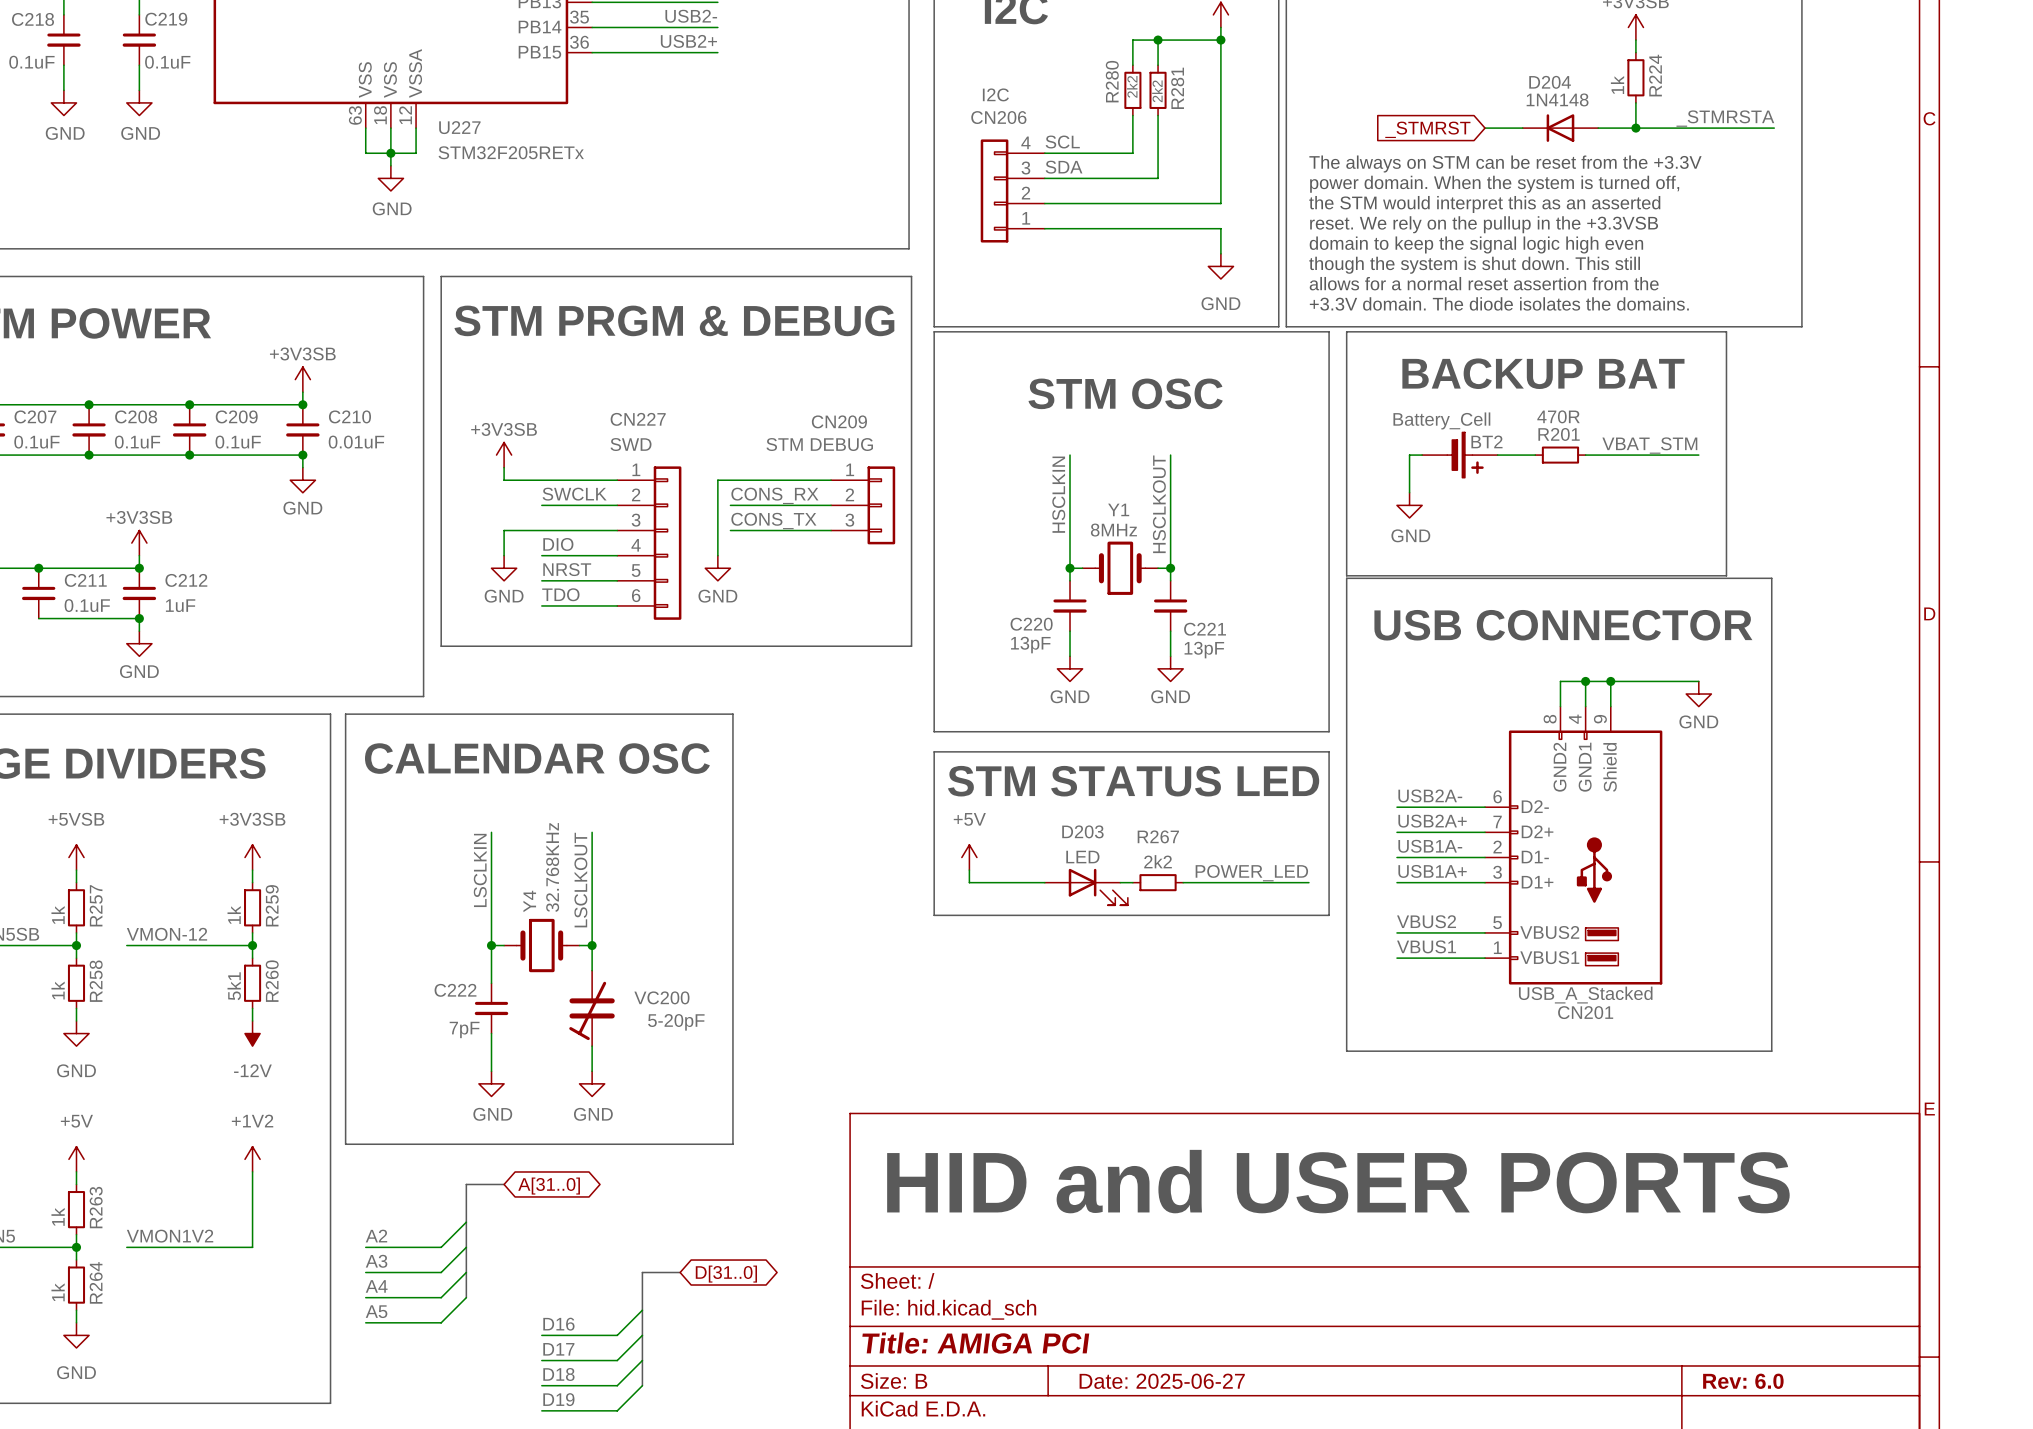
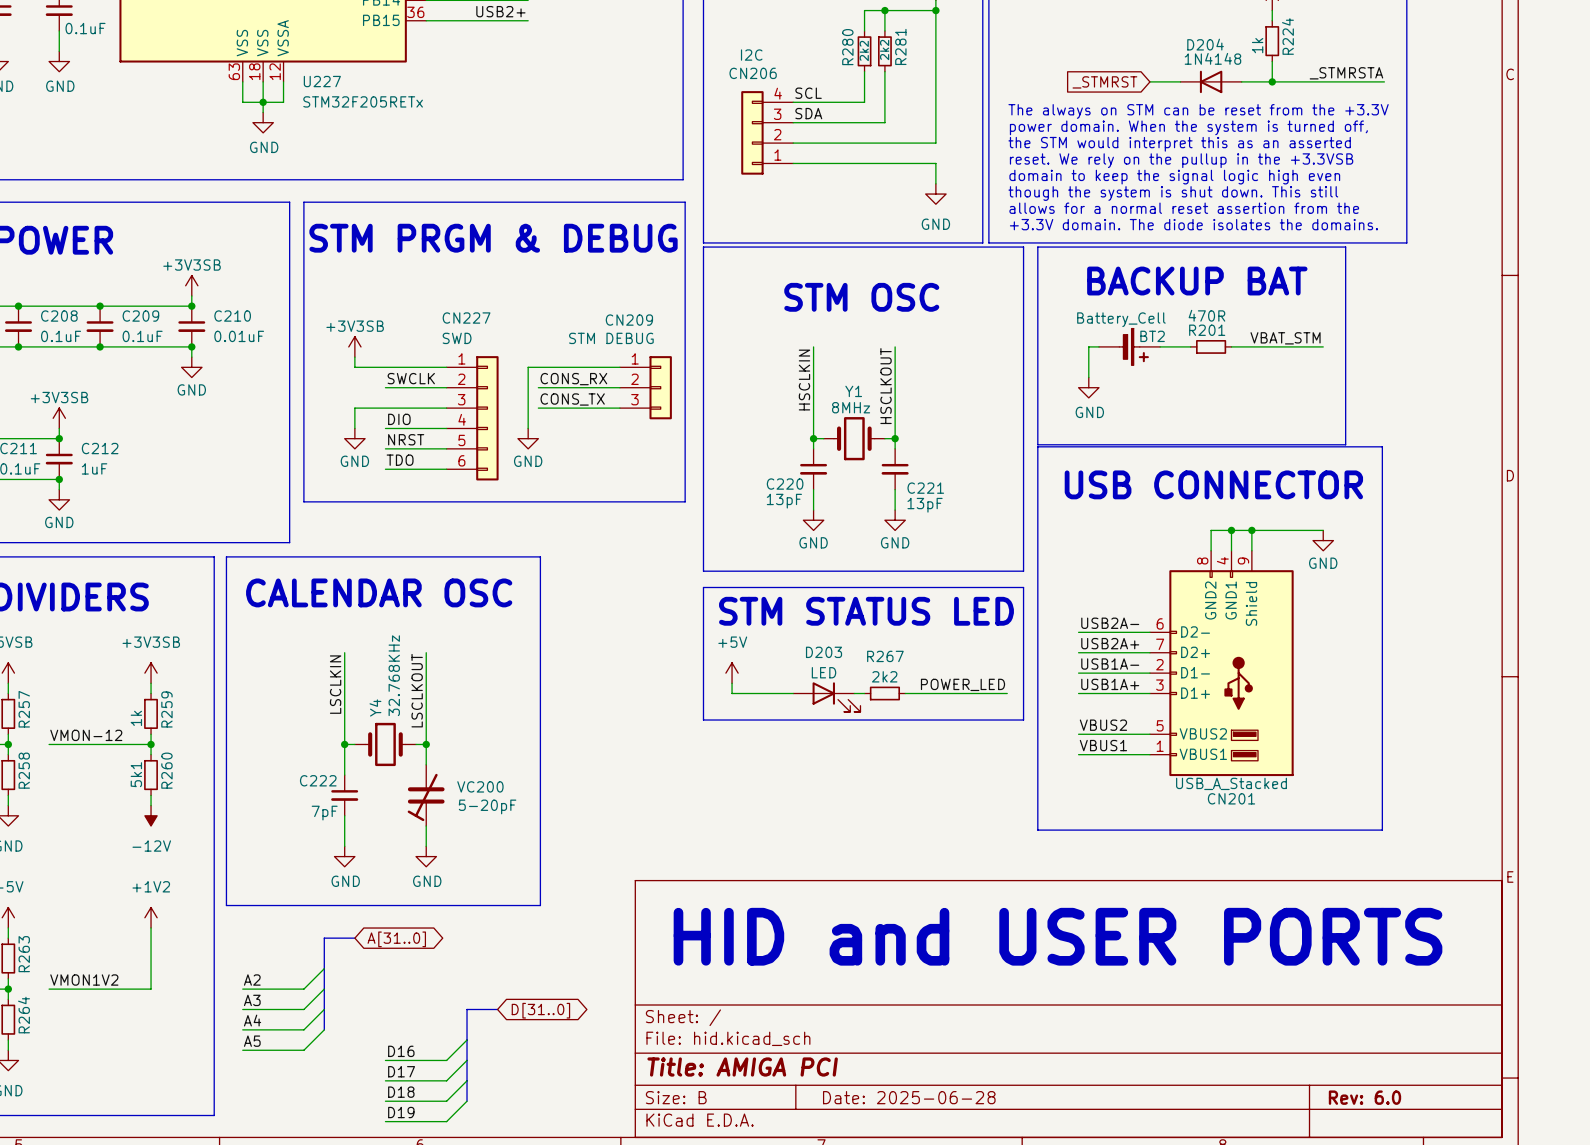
title block: Date: 2025-06-27 (1162, 1381) -> Date: 2025-06-28 (909, 1097)

